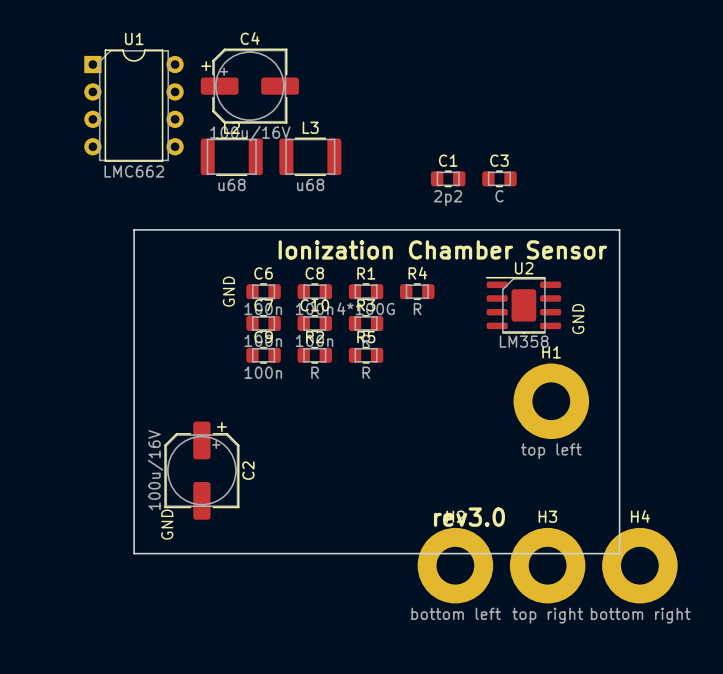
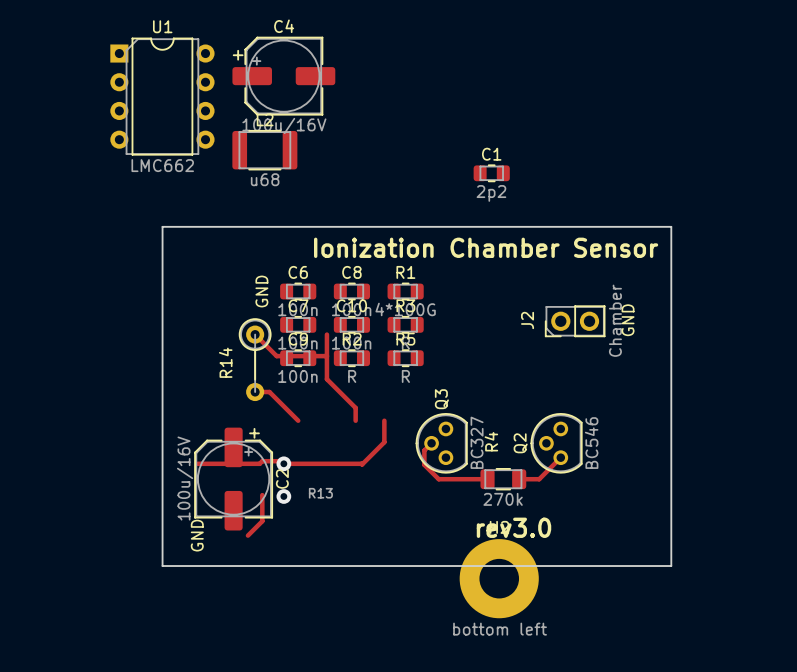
L3: u68 (310, 156) -> none
C3: C (499, 178) -> none
R4 footprint: [400, 283, 435, 300] -> [480, 468, 527, 491]
U2: LM358 (523, 305) -> none
R4 value: R (417, 309) -> 270k (503, 499)
J2: none -> Chamber (575, 321)
track: none -> (255, 334) (276, 356) (326, 356)
track: none -> (326, 334) (326, 379) (355, 407) (355, 420)
R14: none -> (255, 359)
track: none -> (255, 392) (269, 392) (298, 420)
H1: top left (551, 401) -> none
track: none -> (384, 420) (384, 442) (362, 464) (283, 463) (281, 461) (262, 461) (259, 463) (197, 463)
track: none -> (431, 443) (424, 450) (424, 464) (438, 479) (487, 479)
Q3: none -> BC327 (441, 443)
Q2: none -> BC546 (556, 443)
track: none -> (560, 457) (539, 479) (519, 479)
via: none -> (283, 463)
R13: none -> (320, 493)
track: none -> (262, 495) (262, 521) (247, 535)
via: none -> (283, 496)
H3: top right (547, 565) -> none
H4: bottom right (639, 565) -> none

